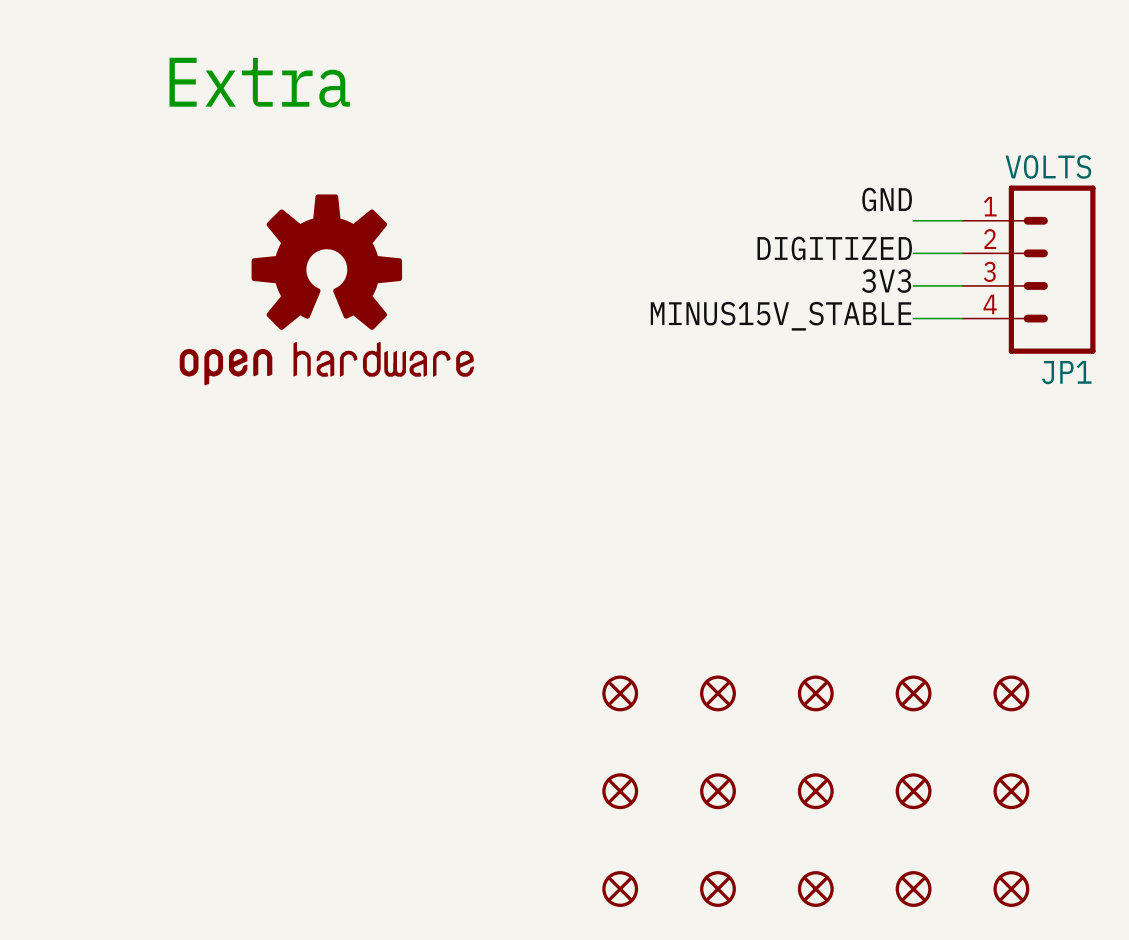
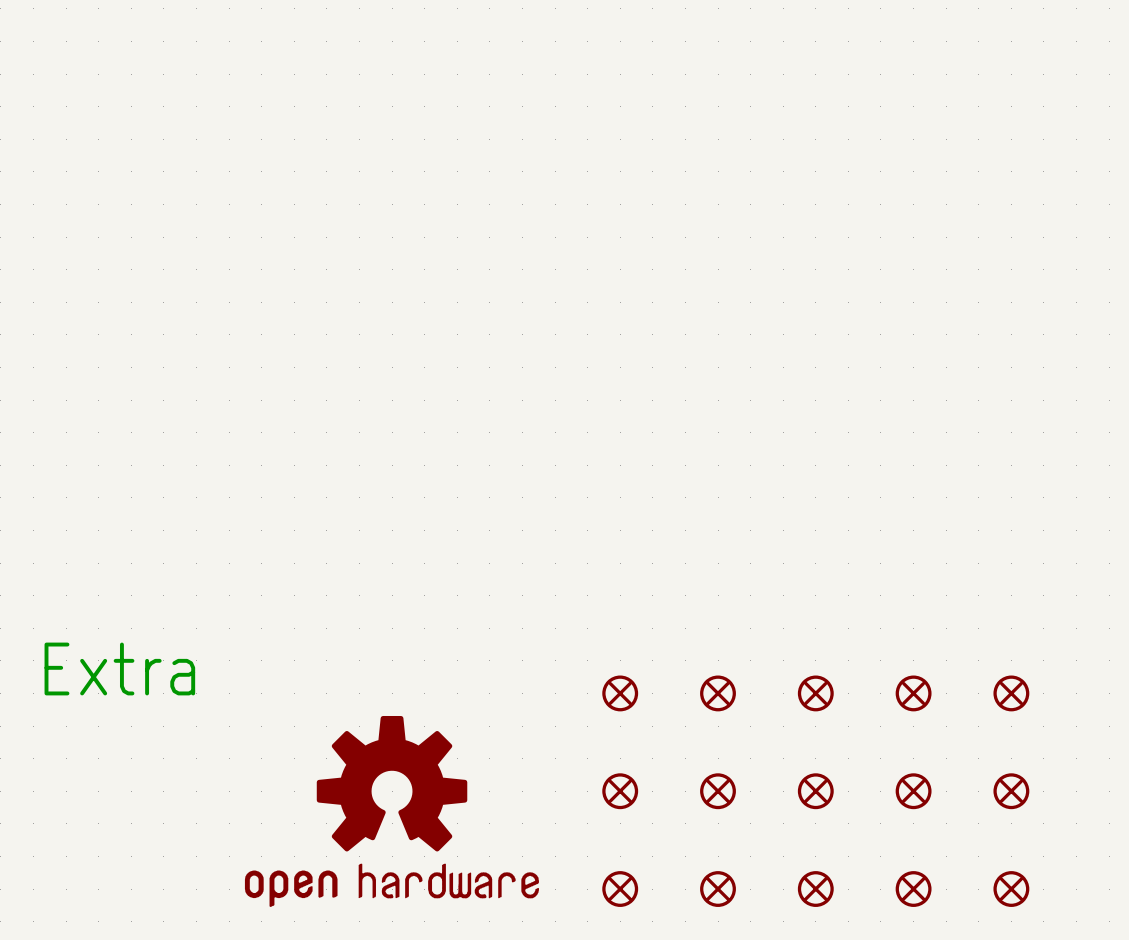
text: Extra (259, 82) -> none
label: GND (887, 199) -> none
wire: (913, 220) (962, 220) -> none
label: DIGITIZED (834, 248) -> none
wire: (913, 253) (962, 253) -> none
JP1: VOLTS (1028, 269) -> none
label: 3V3 (886, 281) -> none
wire: (913, 285) (962, 285) -> none
part: (326, 289) -> none
label: MINUS15V_STABLE (781, 316) -> none
wire: (913, 318) (962, 318) -> none
text: none -> Extra (119, 668)
part: none -> (391, 811)

